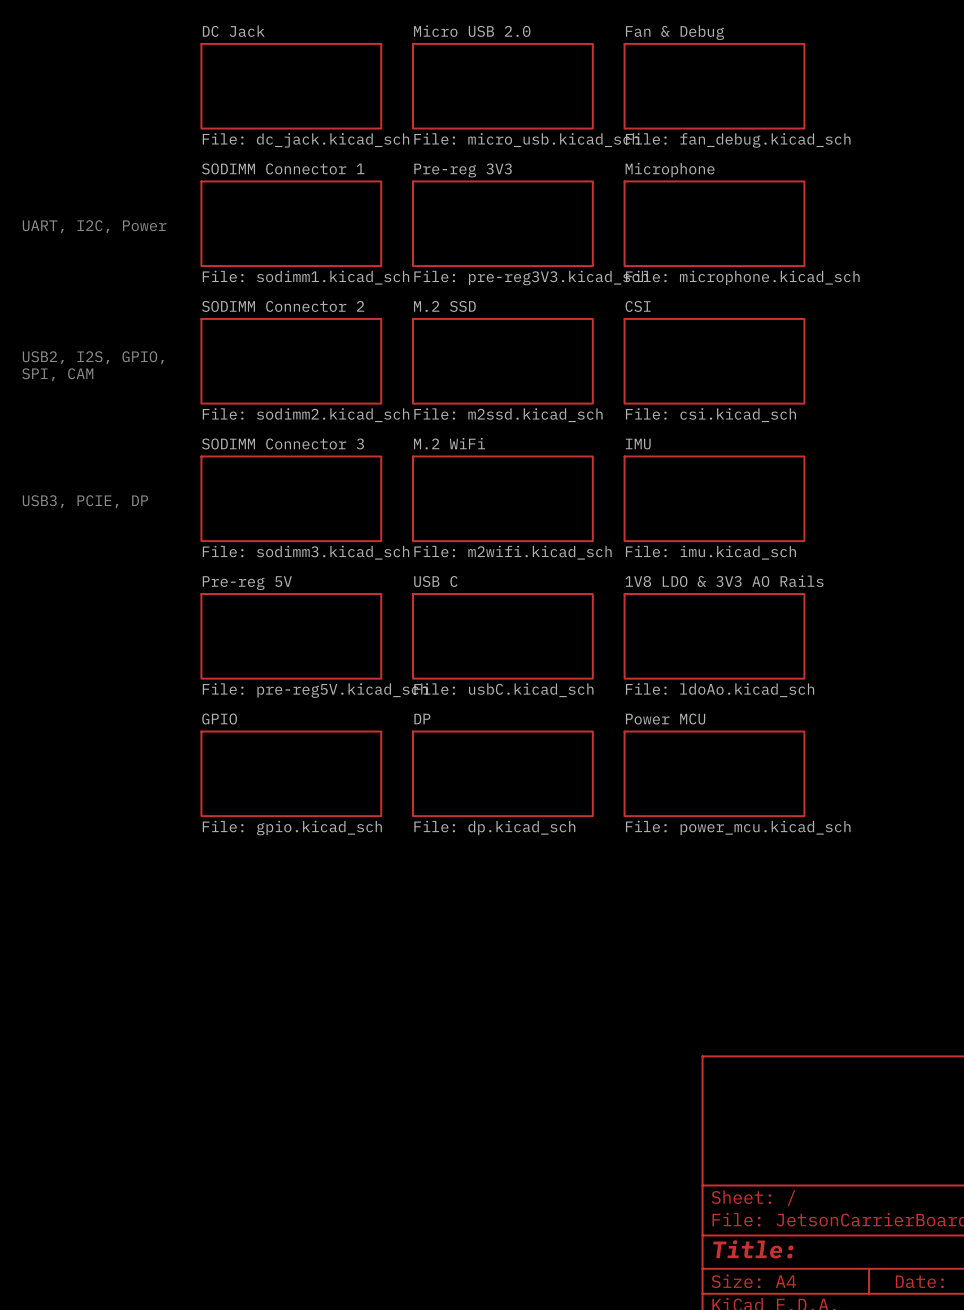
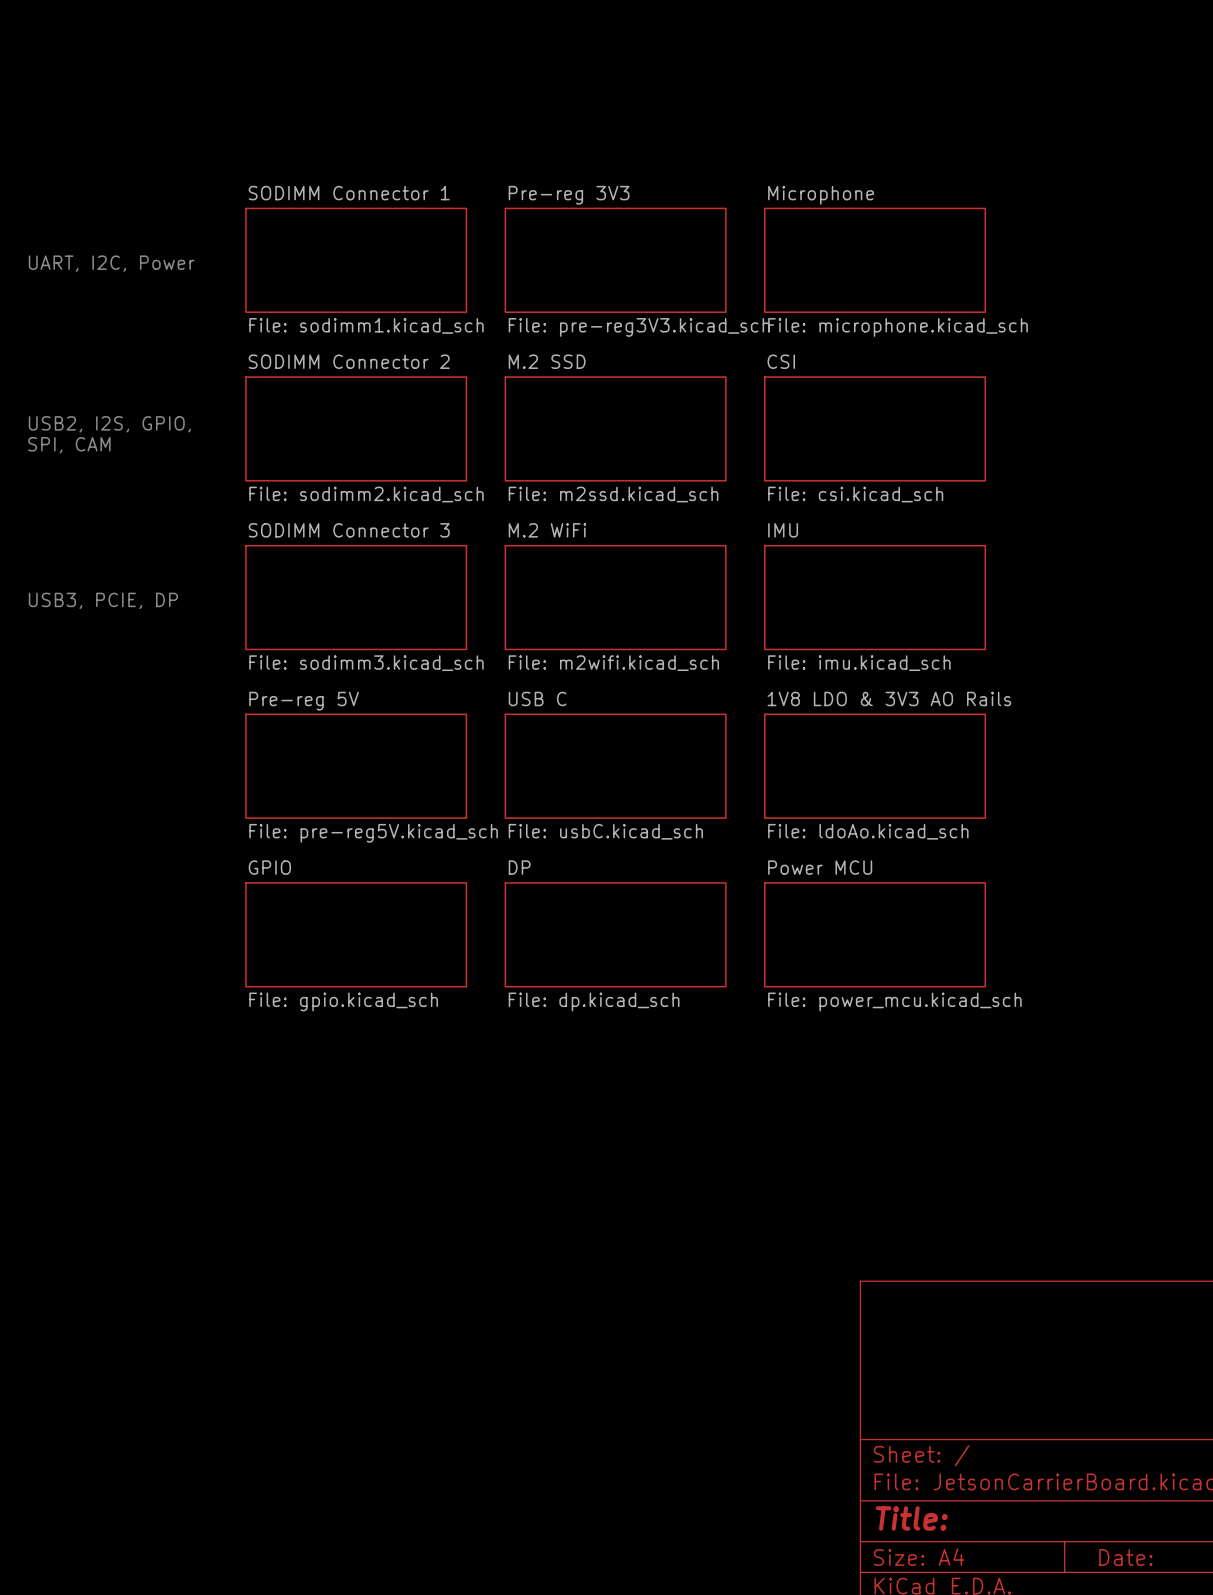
sheet DC Jack: File: dc_jack.kicad_sch (291, 86) -> none
sheet Micro USB 2.0: File: micro_usb.kicad_sch (502, 86) -> none
sheet Fan & Debug: File: fan_debug.kicad_sch (714, 86) -> none

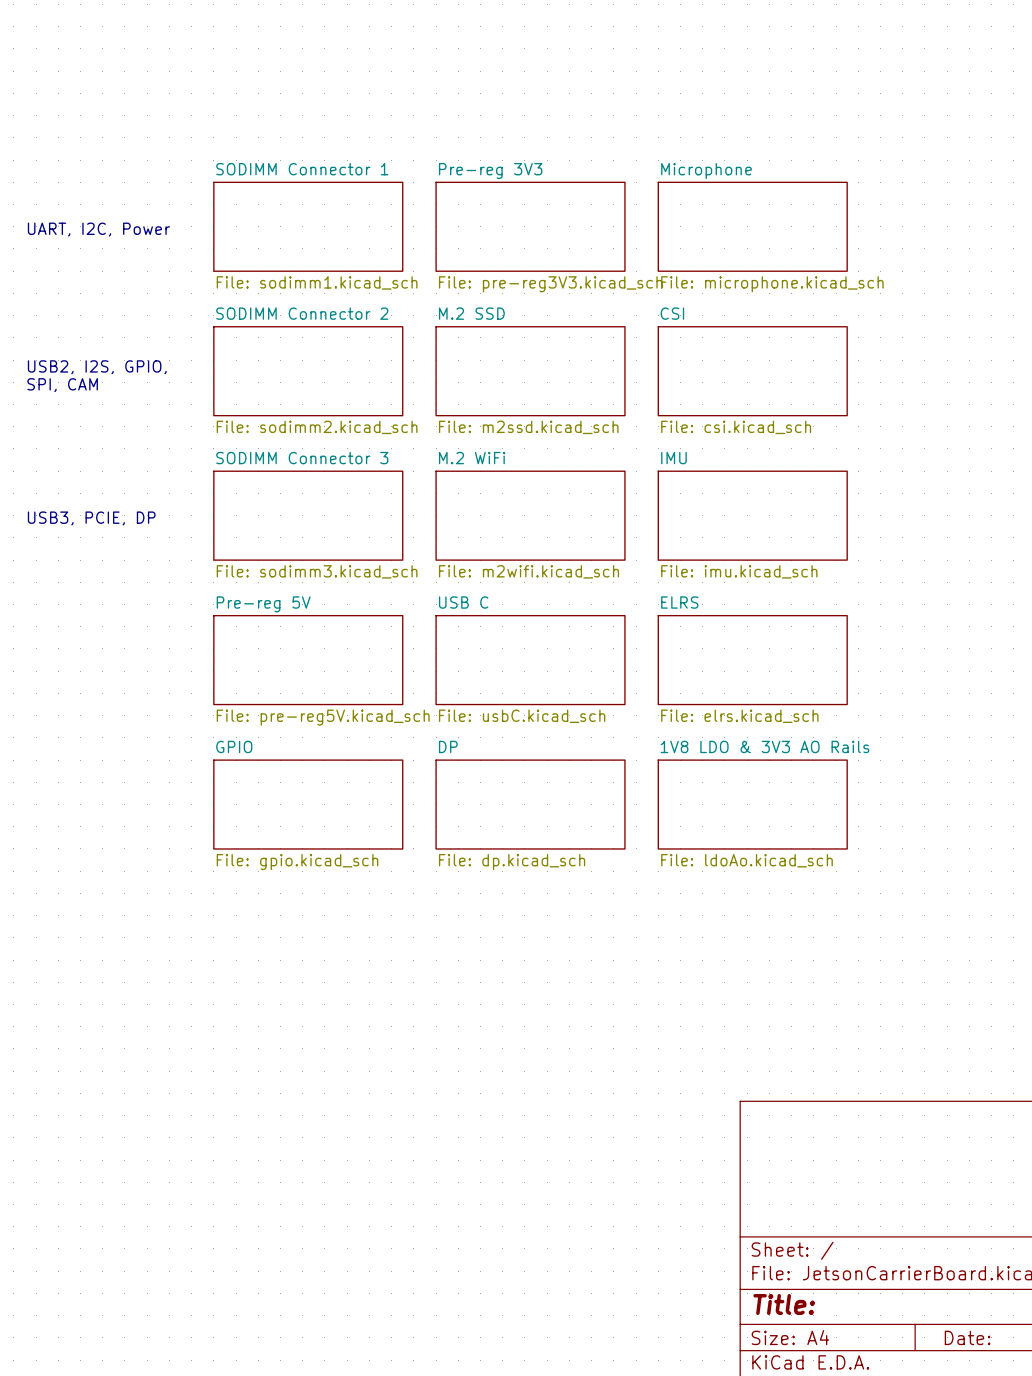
sheet 1V8 LDO & 3V3 AO Rails name: 1V8 LDO & 3V3 AO Rails (889, 698) -> ELRS (679, 602)
sheet 1V8 LDO & 3V3 AO Rails value: File: ldoAo.kicad_sch (868, 831) -> File: elrs.kicad_sch (739, 716)
sheet Power MCU name: Power MCU (820, 867) -> 1V8 LDO & 3V3 AO Rails (764, 746)
sheet Power MCU value: File: power_mcu.kicad_sch (894, 1001) -> File: ldoAo.kicad_sch (746, 860)

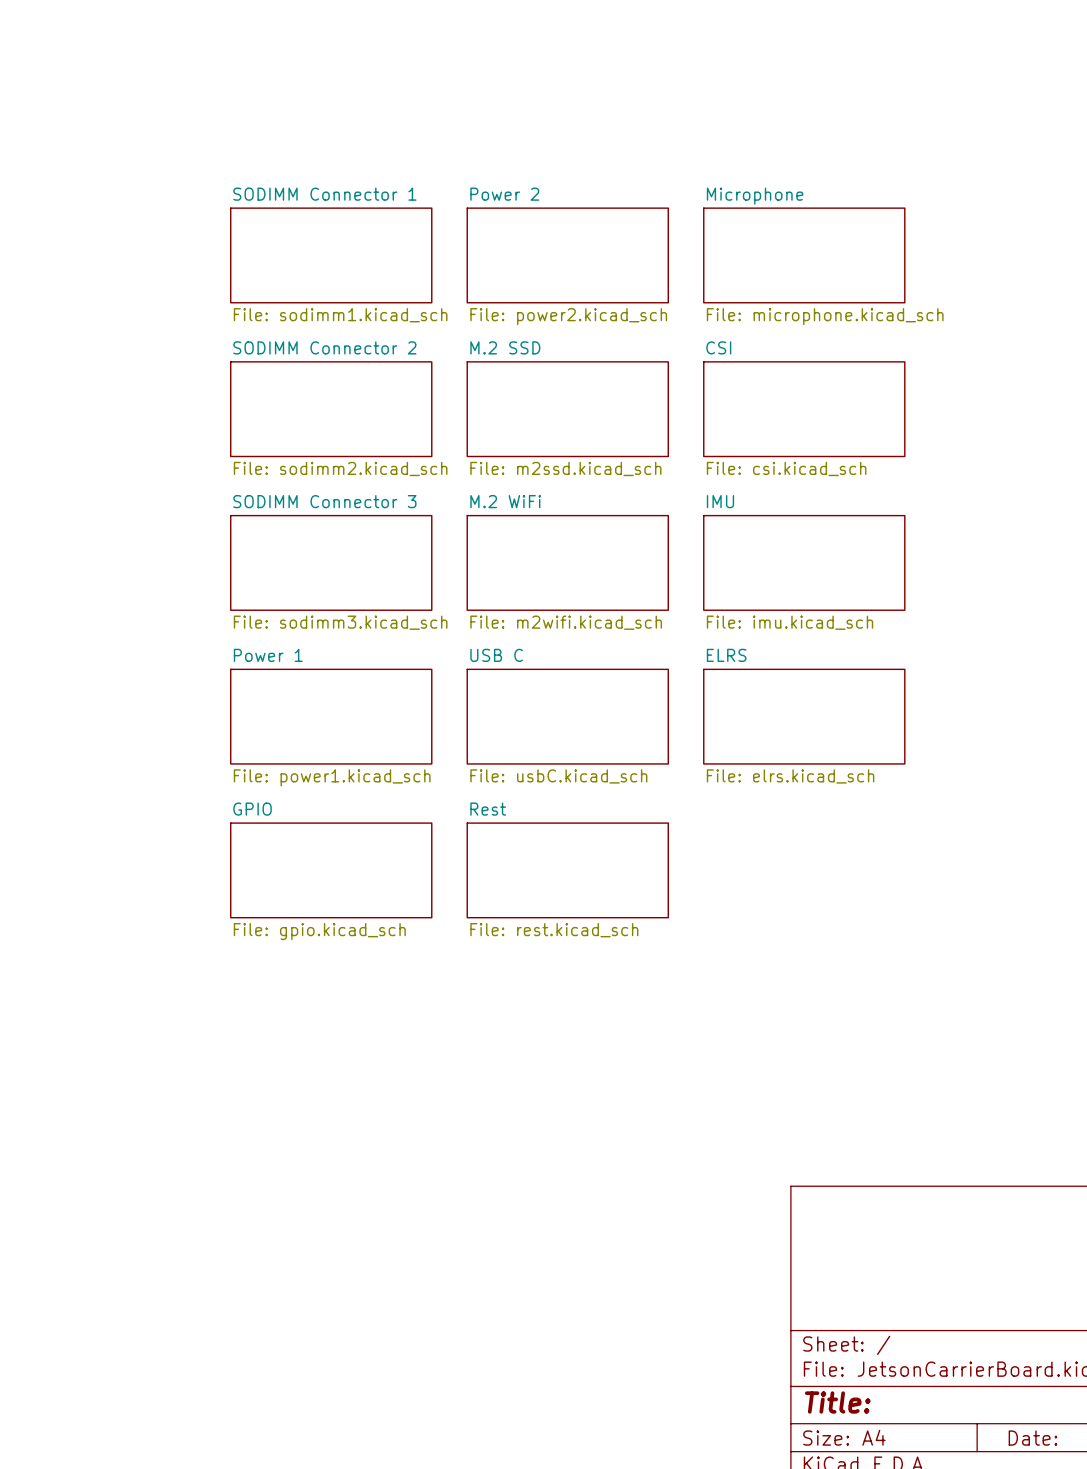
sheet Pre-reg 3V3 name: Pre-reg 3V3 (490, 171) -> Power 2 (504, 194)
text: UART, I2C, Power (98, 229) -> none
sheet Pre-reg 3V3 value: File: pre-reg3V3.kicad_sch (550, 284) -> File: power2.kicad_sch (568, 316)
text: USB2, I2S, GPIO, (97, 367) -> none
text: SPI, CAM (62, 385) -> none
text: USB3, PCIE, DP (91, 518) -> none
sheet Pre-reg 5V name: Pre-reg 5V (263, 604) -> Power 1 (268, 655)
sheet Pre-reg 5V value: File: pre-reg5V.kicad_sch (323, 717) -> File: power1.kicad_sch (332, 777)
sheet DP name: DP (448, 746) -> Rest (488, 809)
sheet 1V8 LDO & 3V3 AO Rails: File: ldoAo.kicad_sch (752, 804) -> none
sheet DP value: File: dp.kicad_sch (512, 862) -> File: rest.kicad_sch (554, 930)

